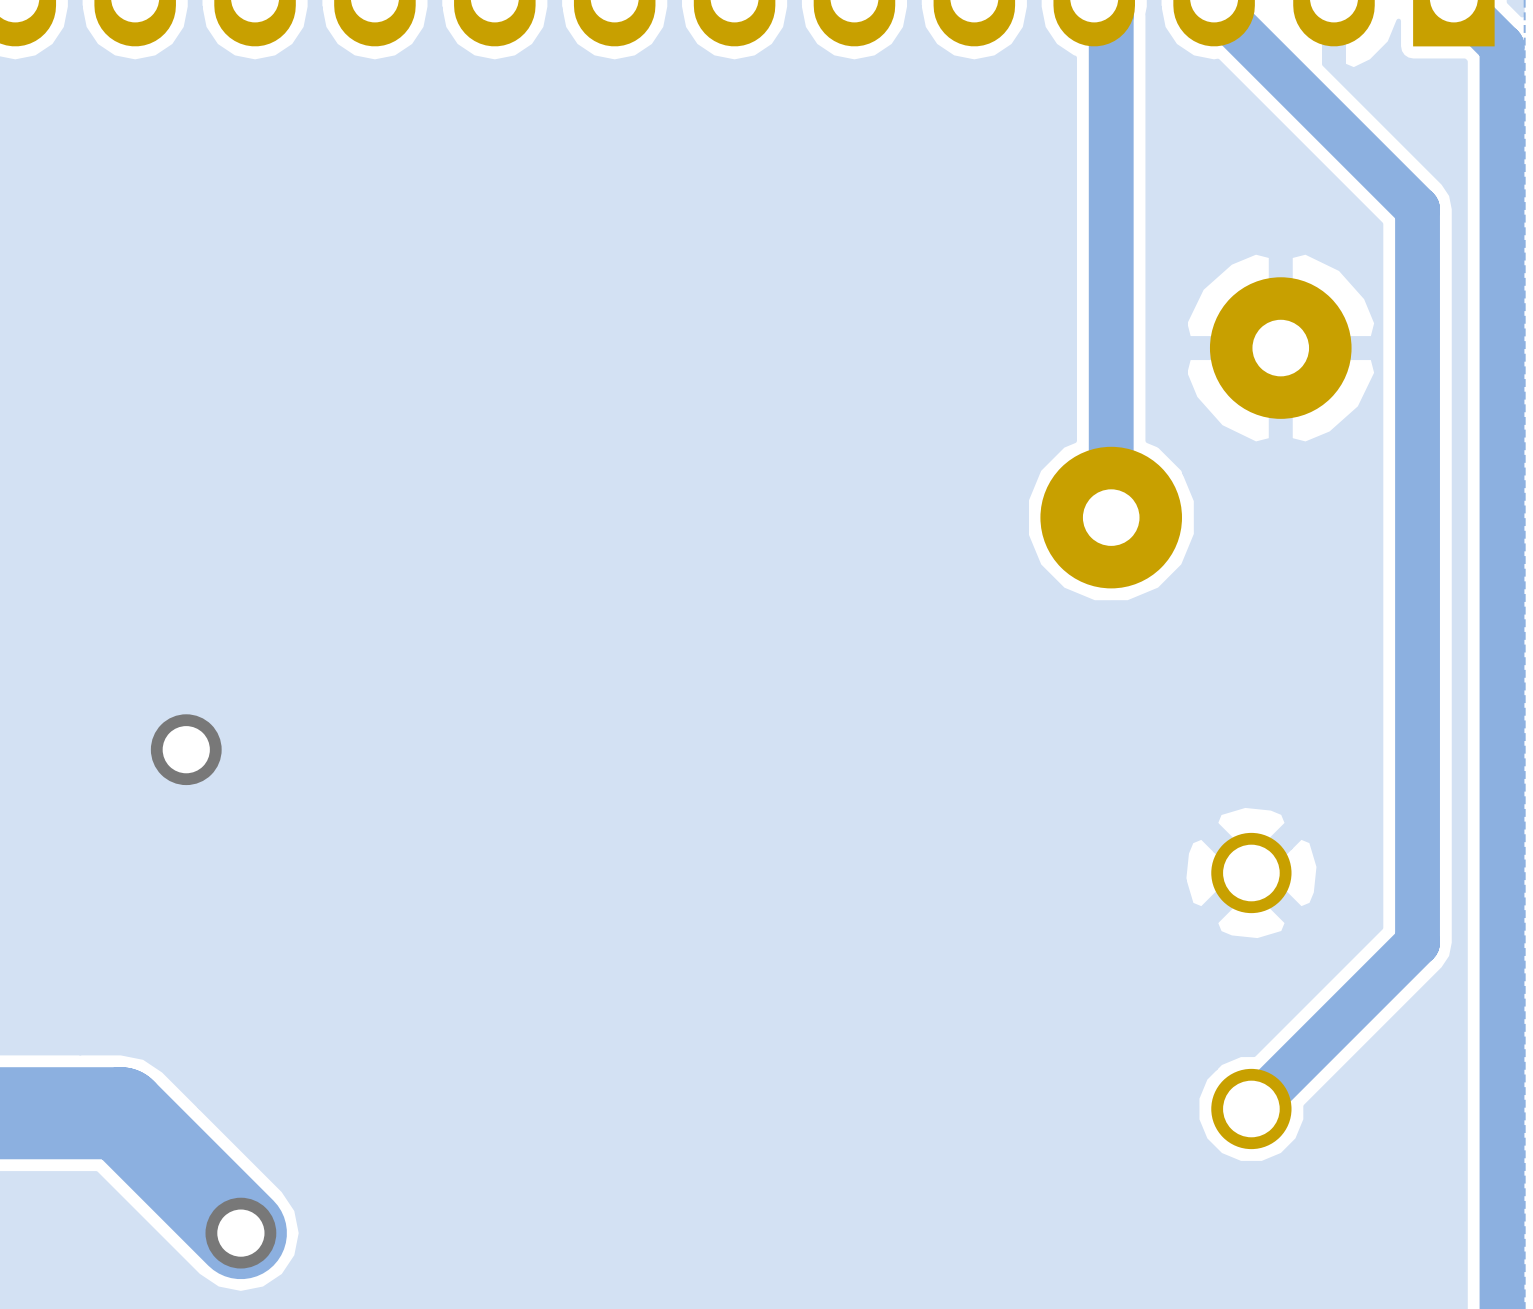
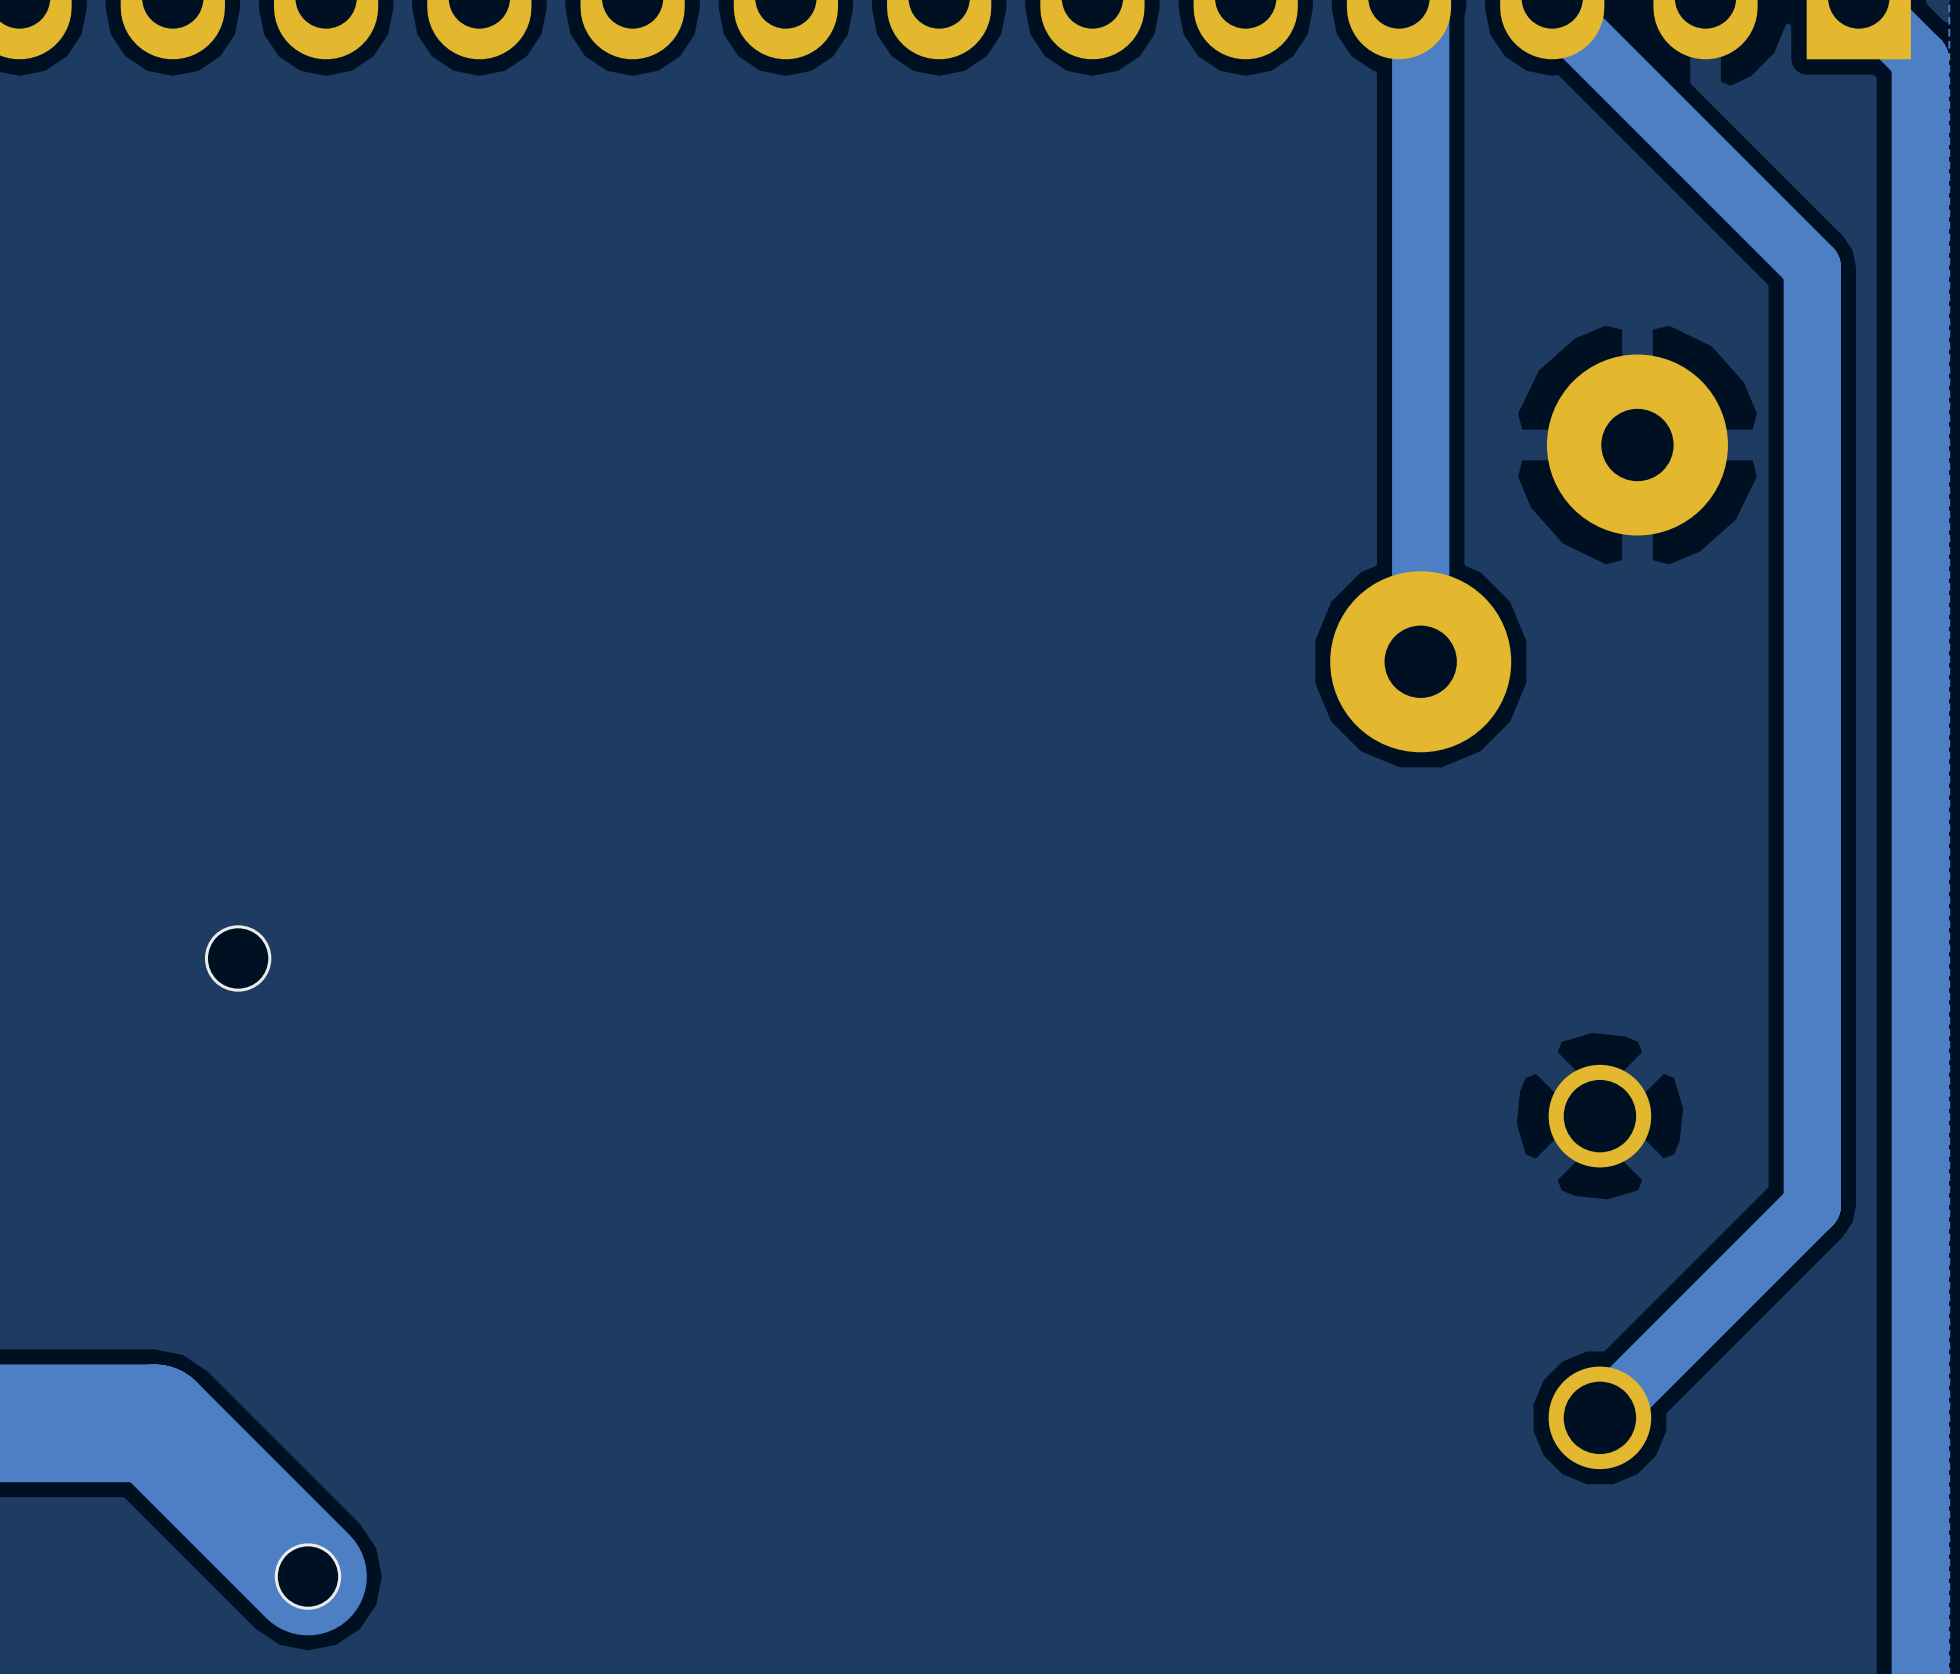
via size: [150, 714, 222, 786] -> [204, 925, 272, 992]
via size: [205, 1197, 277, 1269] -> [274, 1543, 342, 1610]

